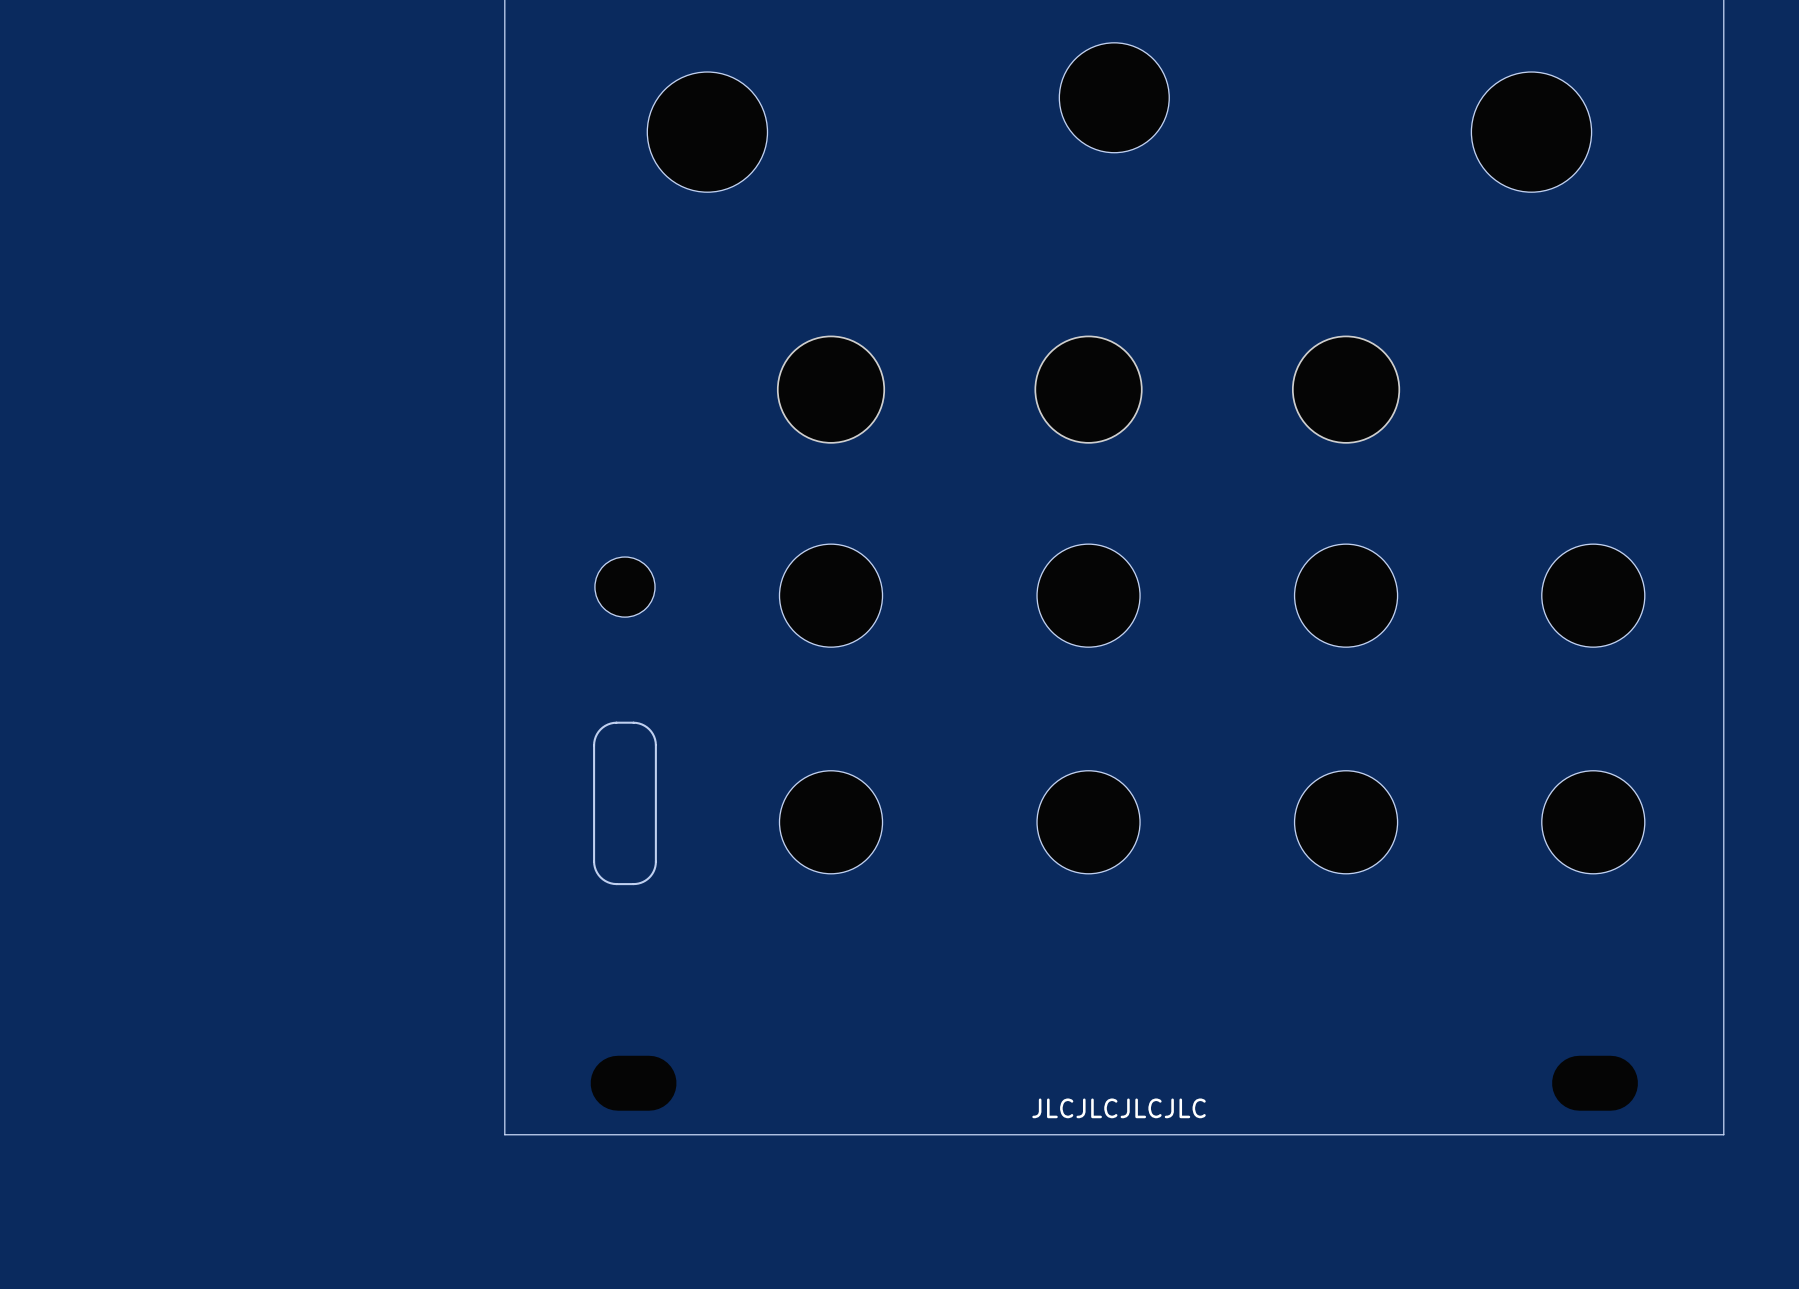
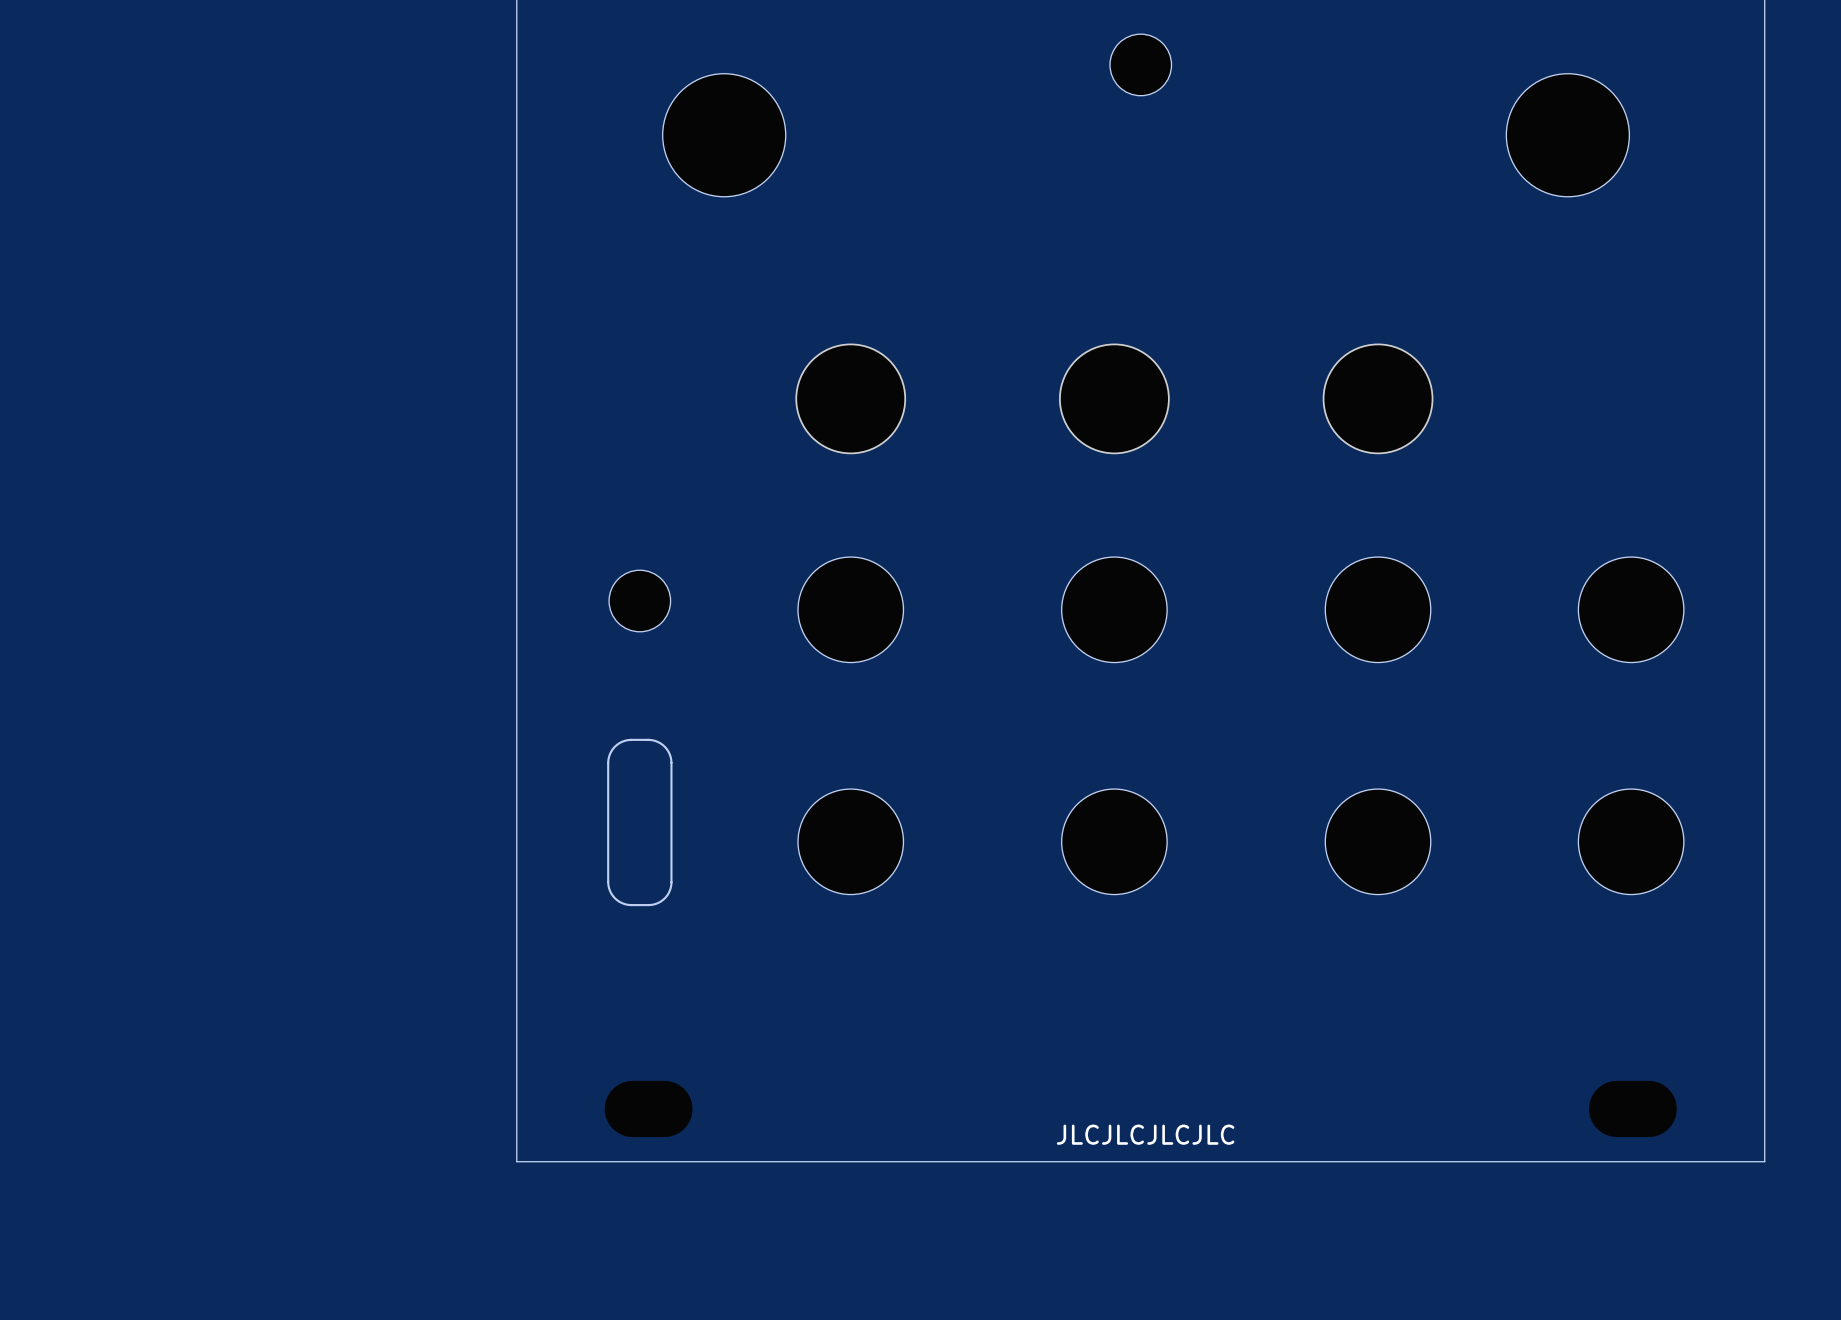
part: none -> (1140, 64)
part: (1114, 97) -> none

